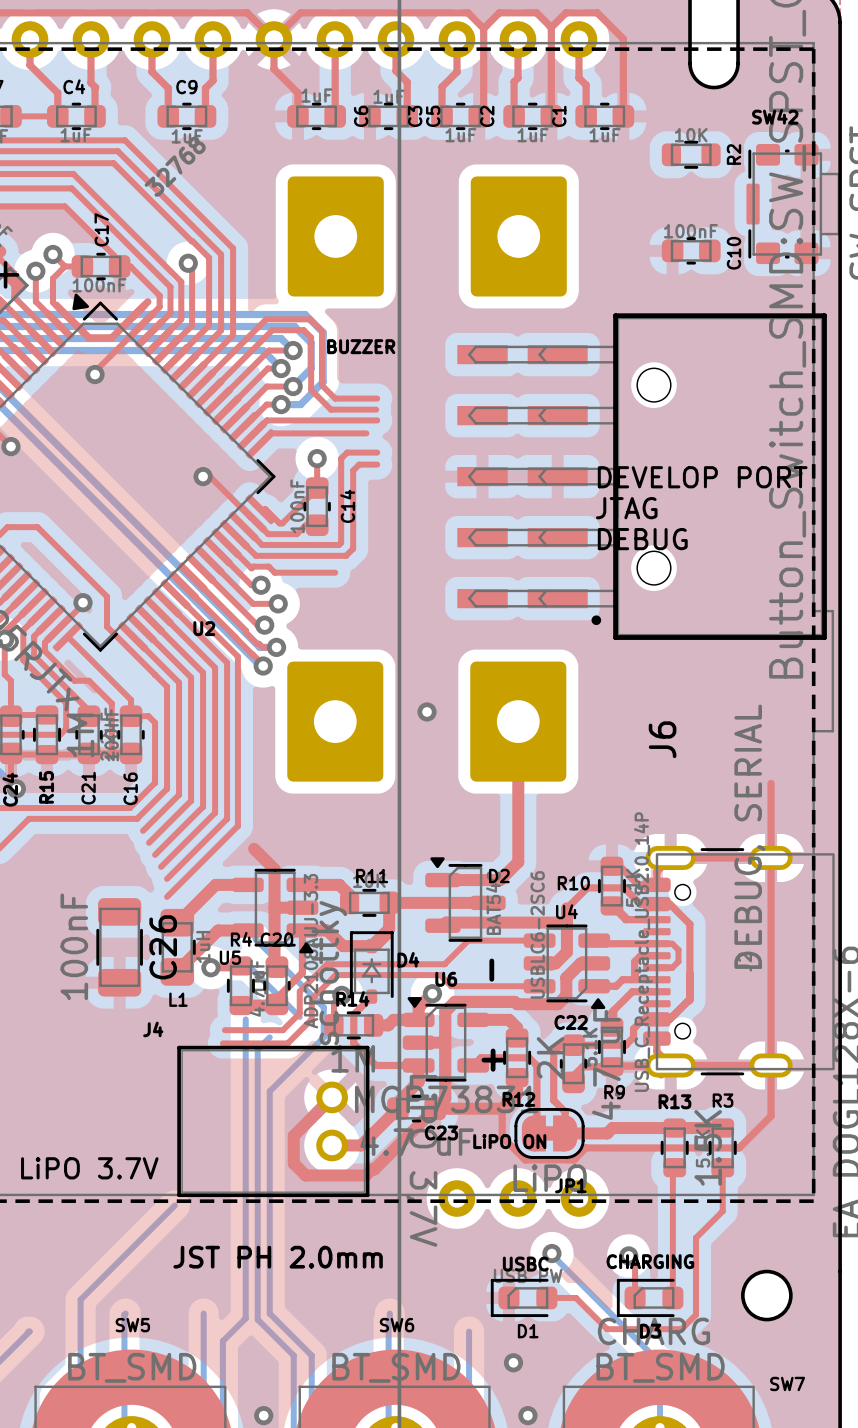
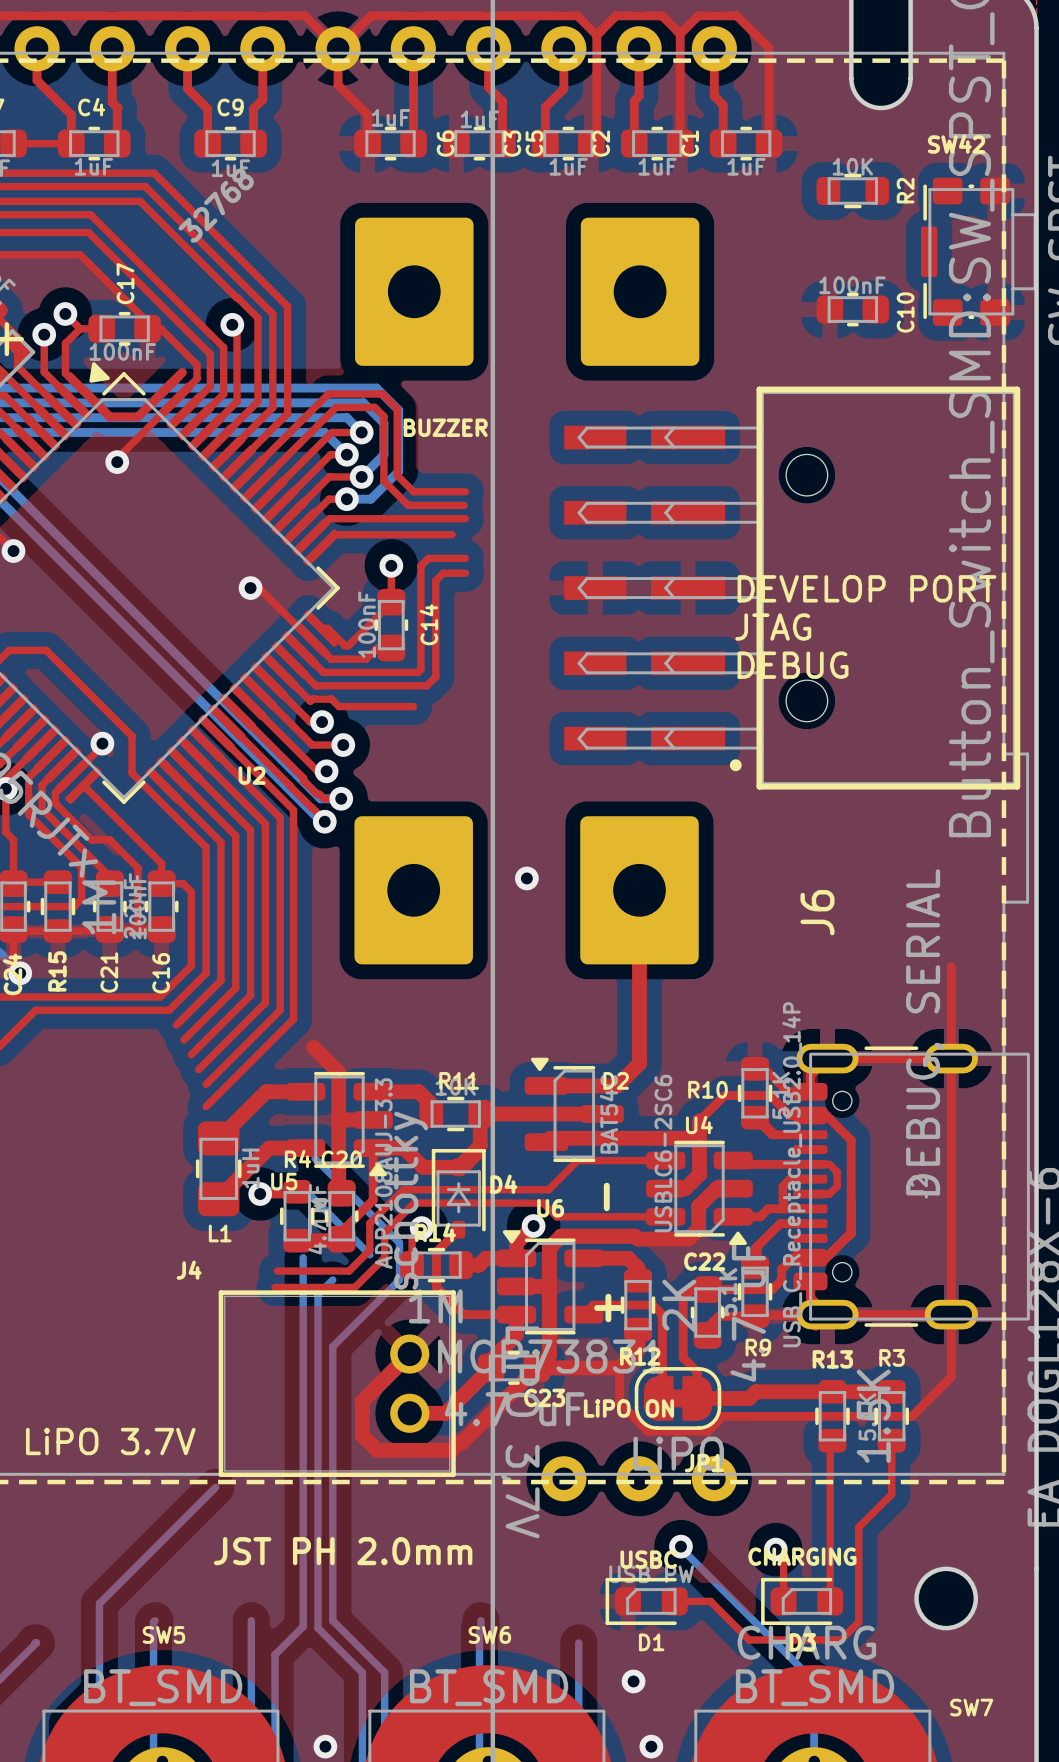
C26: 100nF (119, 947) -> none

